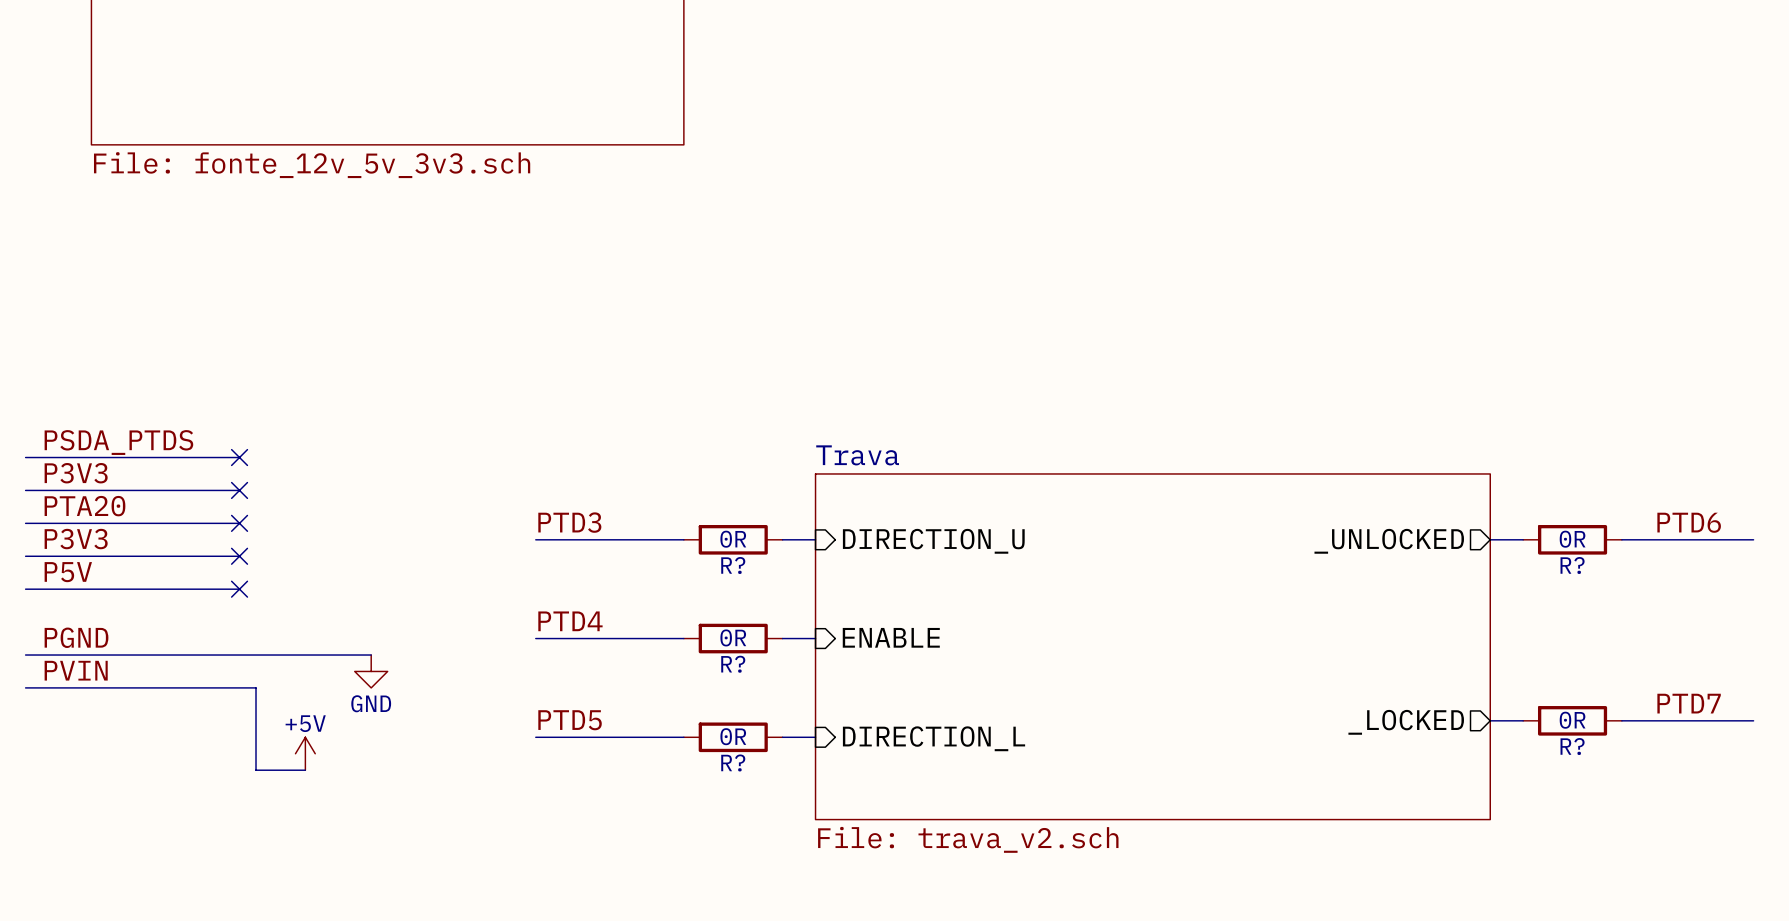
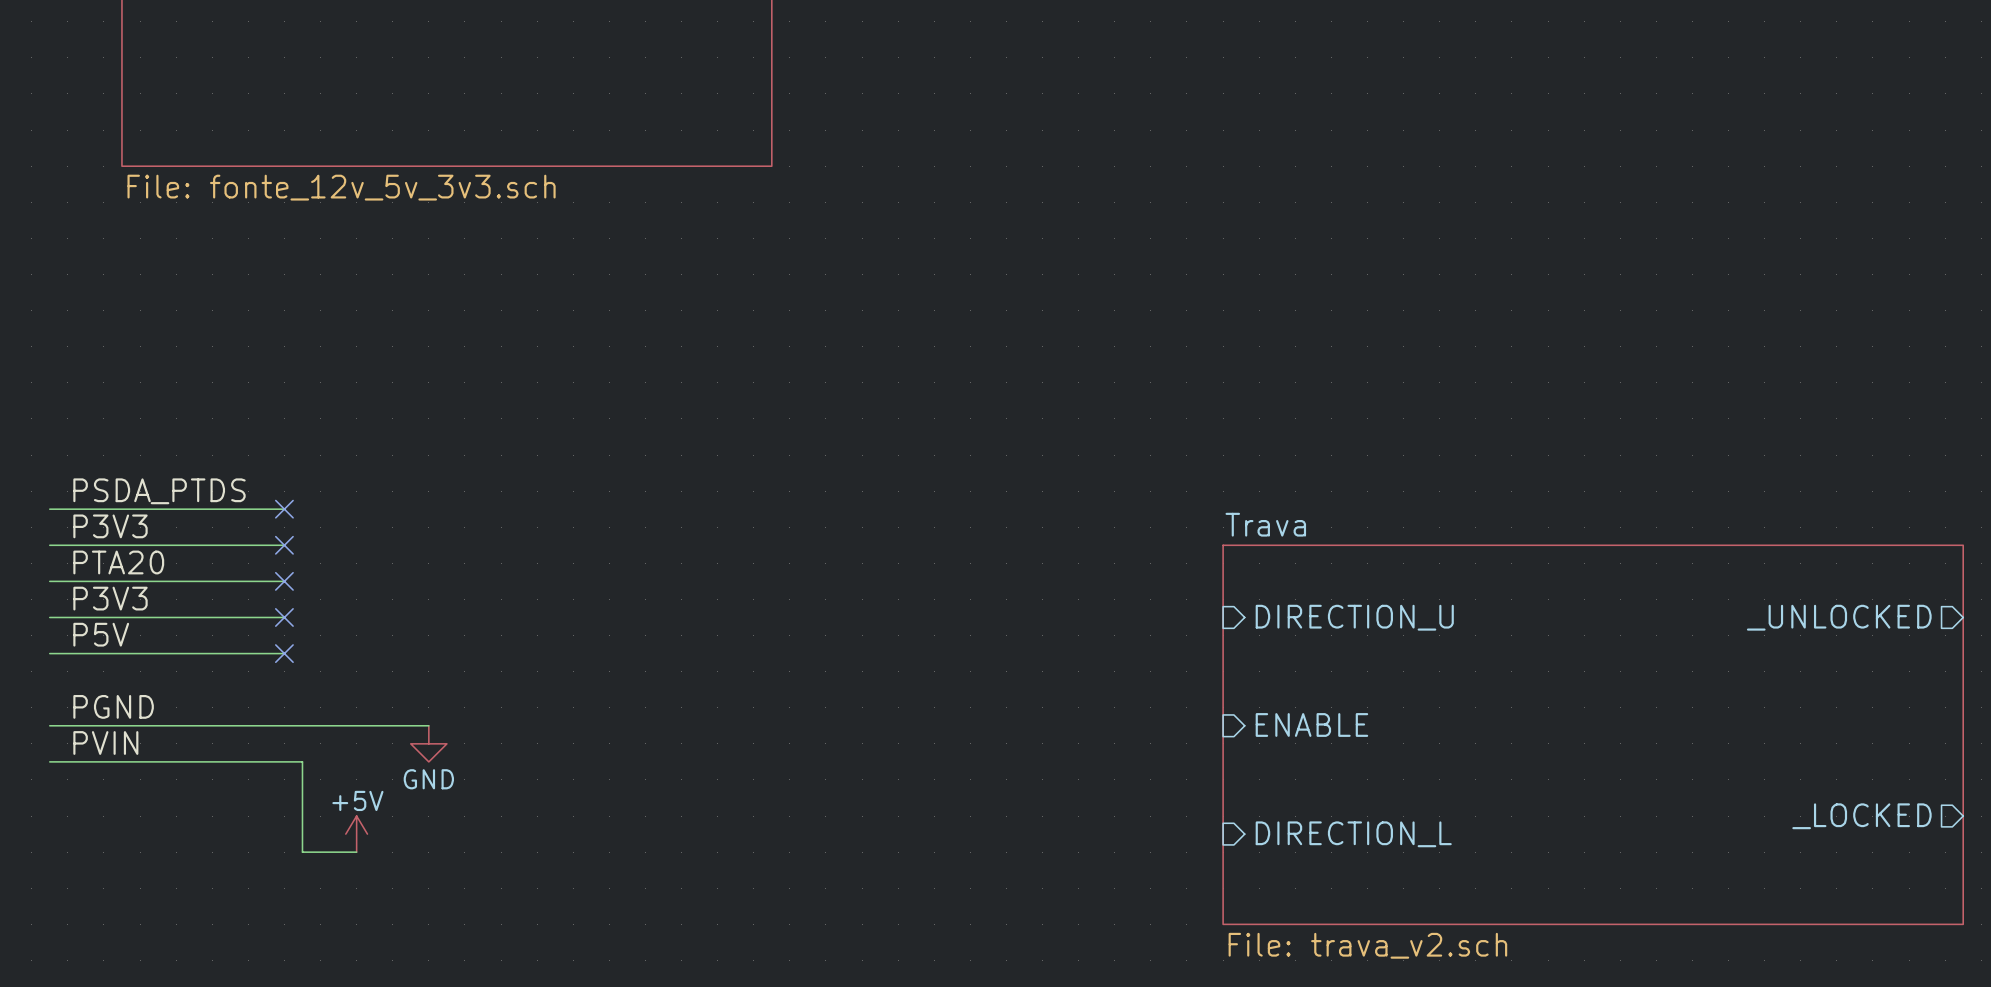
label: PTD3 (569, 522) -> none
label: PTD6 (1689, 522) -> none
wire: (535, 539) (683, 539) -> none
R?: 0R (733, 539) -> none
wire: (782, 539) (815, 539) -> none
wire: (1490, 539) (1523, 539) -> none
R?: 0R (1572, 539) -> none
wire: (1621, 539) (1753, 539) -> none
sheet pin position: DIRECTION_U (933, 541) -> DIRECTION_U (1354, 617)
sheet pin position: _UNLOCKED (1389, 541) -> _UNLOCKED (1839, 617)
label: PTD4 (570, 621) -> none
sheet pin position: ENABLE (891, 637) -> ENABLE (1311, 724)
wire: (535, 638) (683, 638) -> none
R?: 0R (733, 638) -> none
wire: (782, 638) (815, 638) -> none
sheet Trava position: (1152, 646) -> (1593, 734)
label: PTD7 (1689, 703) -> none
label: PTD5 (570, 720) -> none
wire: (1490, 720) (1523, 720) -> none
R?: 0R (1572, 720) -> none
wire: (1621, 720) (1753, 720) -> none
sheet pin position: _LOCKED (1406, 722) -> _LOCKED (1861, 816)
wire: (535, 737) (683, 737) -> none
R?: 0R (733, 737) -> none
wire: (782, 737) (815, 737) -> none
sheet pin position: DIRECTION_L (934, 738) -> DIRECTION_L (1353, 834)

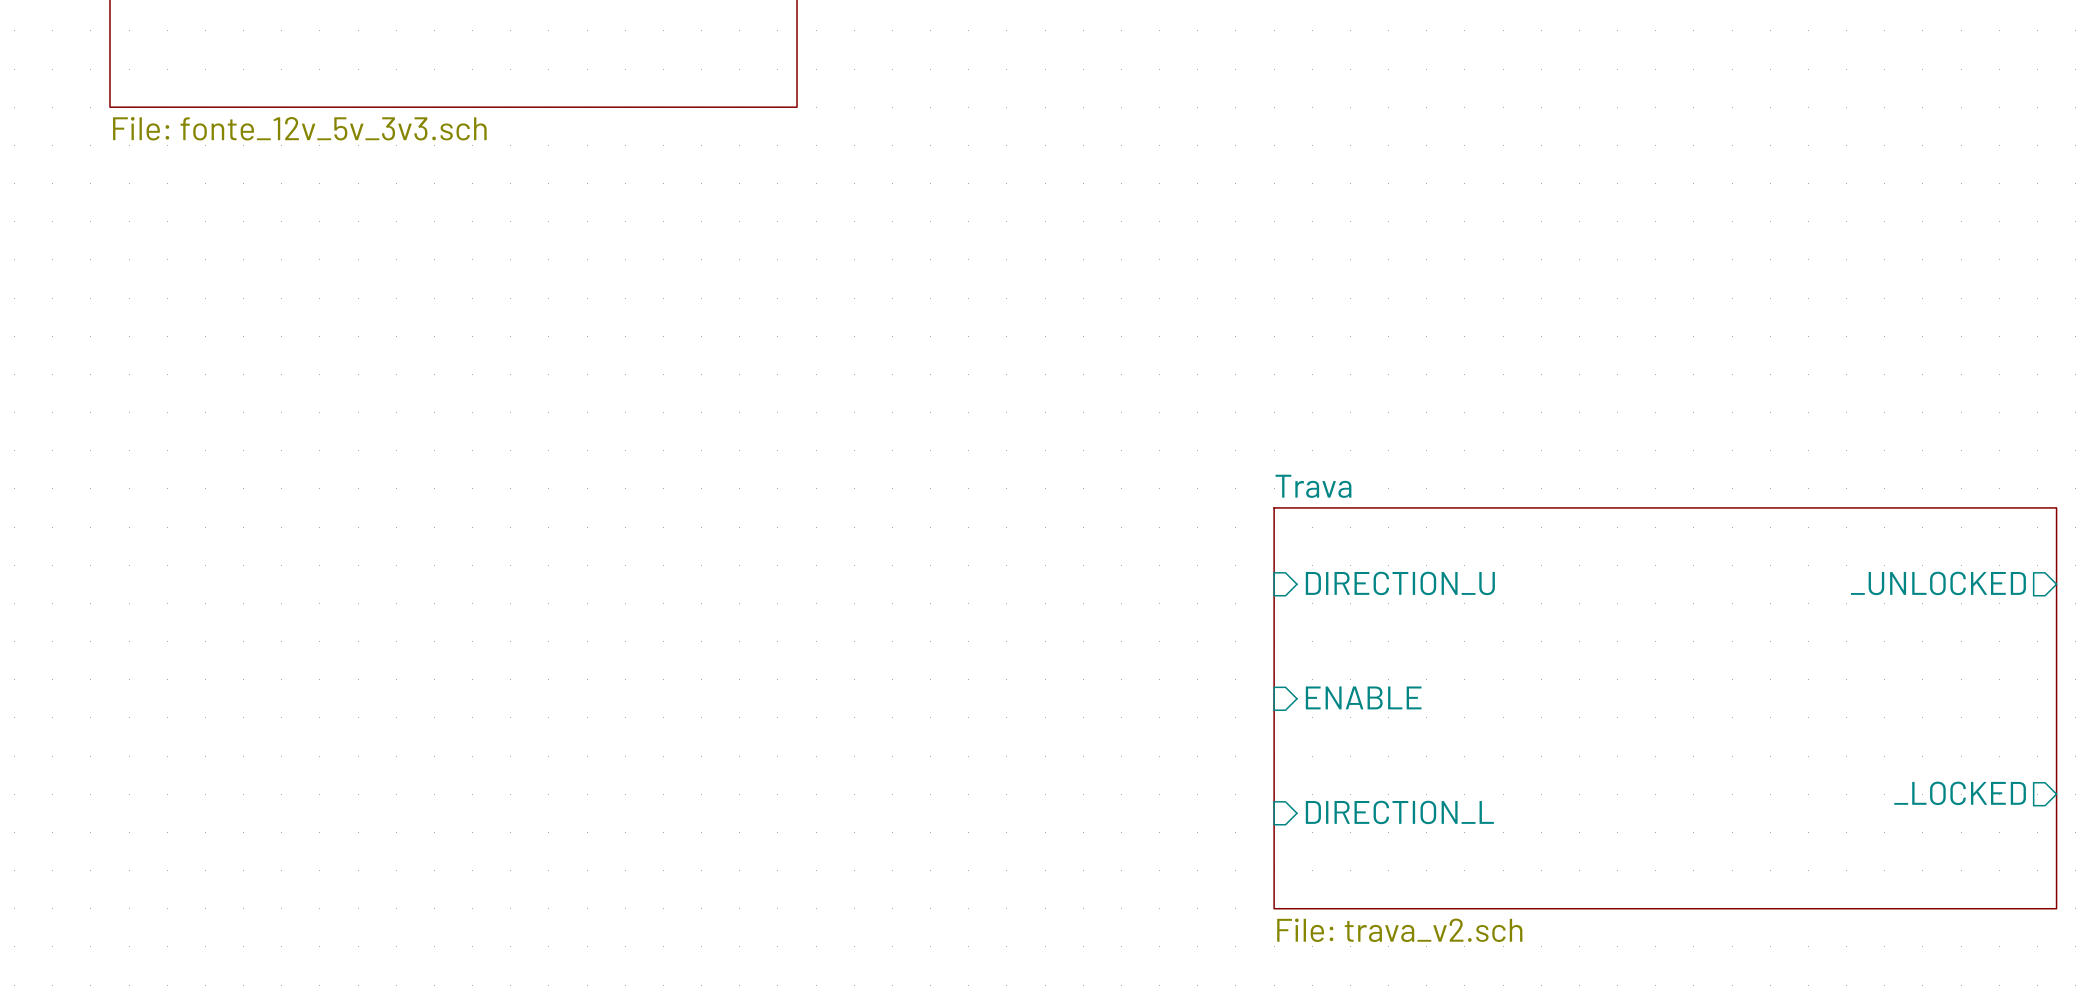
label: PSDA_PTDS (159, 491) -> none
wire: (49, 509) (284, 509) -> none
no-connect mark: (284, 509) -> none
label: P3V3 (110, 526) -> none
wire: (49, 545) (284, 545) -> none
no-connect mark: (284, 545) -> none
label: PTA20 (118, 562) -> none
wire: (49, 581) (284, 581) -> none
no-connect mark: (284, 581) -> none
label: P3V3 (110, 598) -> none
wire: (49, 617) (284, 617) -> none
no-connect mark: (284, 617) -> none
label: P5V (101, 634) -> none
wire: (49, 653) (284, 653) -> none
no-connect mark: (284, 653) -> none
label: PGND (113, 706) -> none
wire: (49, 725) (428, 725) -> none
label: PVIN (105, 743) -> none
power symbol: GND (428, 743) -> none
wire: (49, 761) (302, 761) (302, 852) (356, 852) -> none
power symbol: +5V (356, 834) -> none

